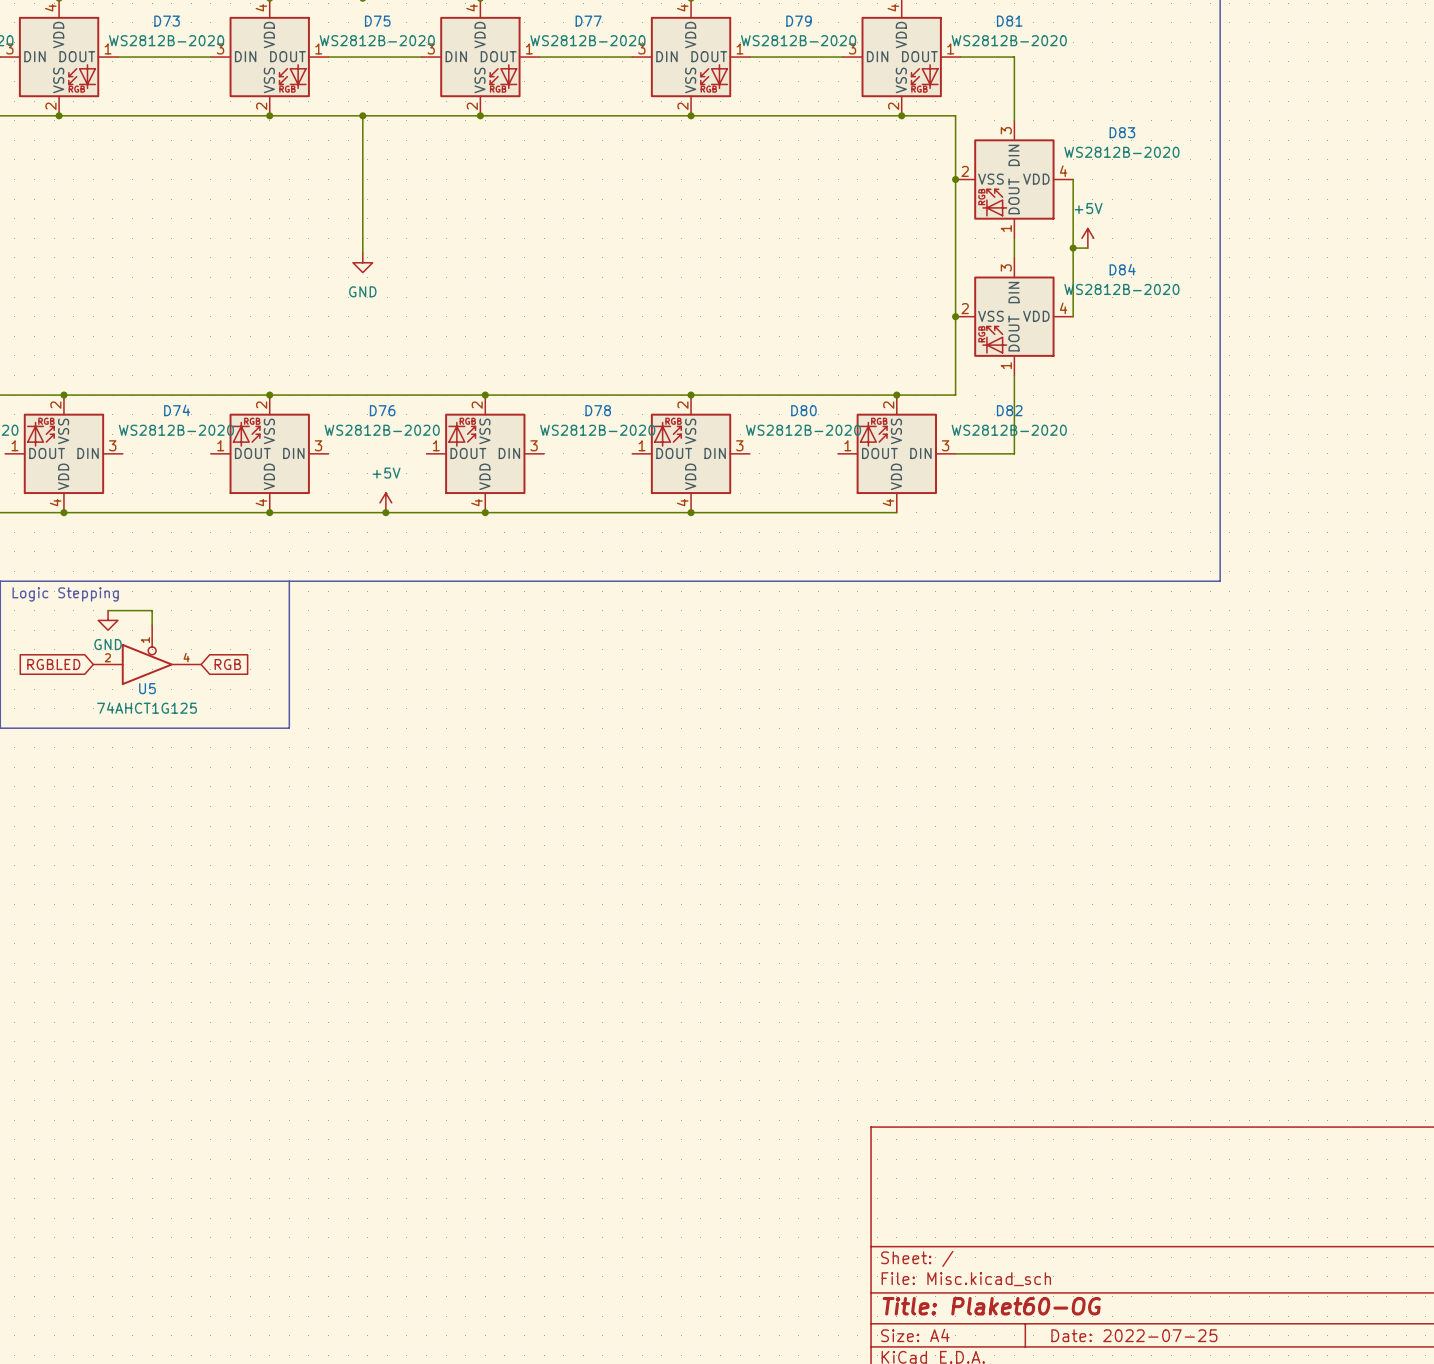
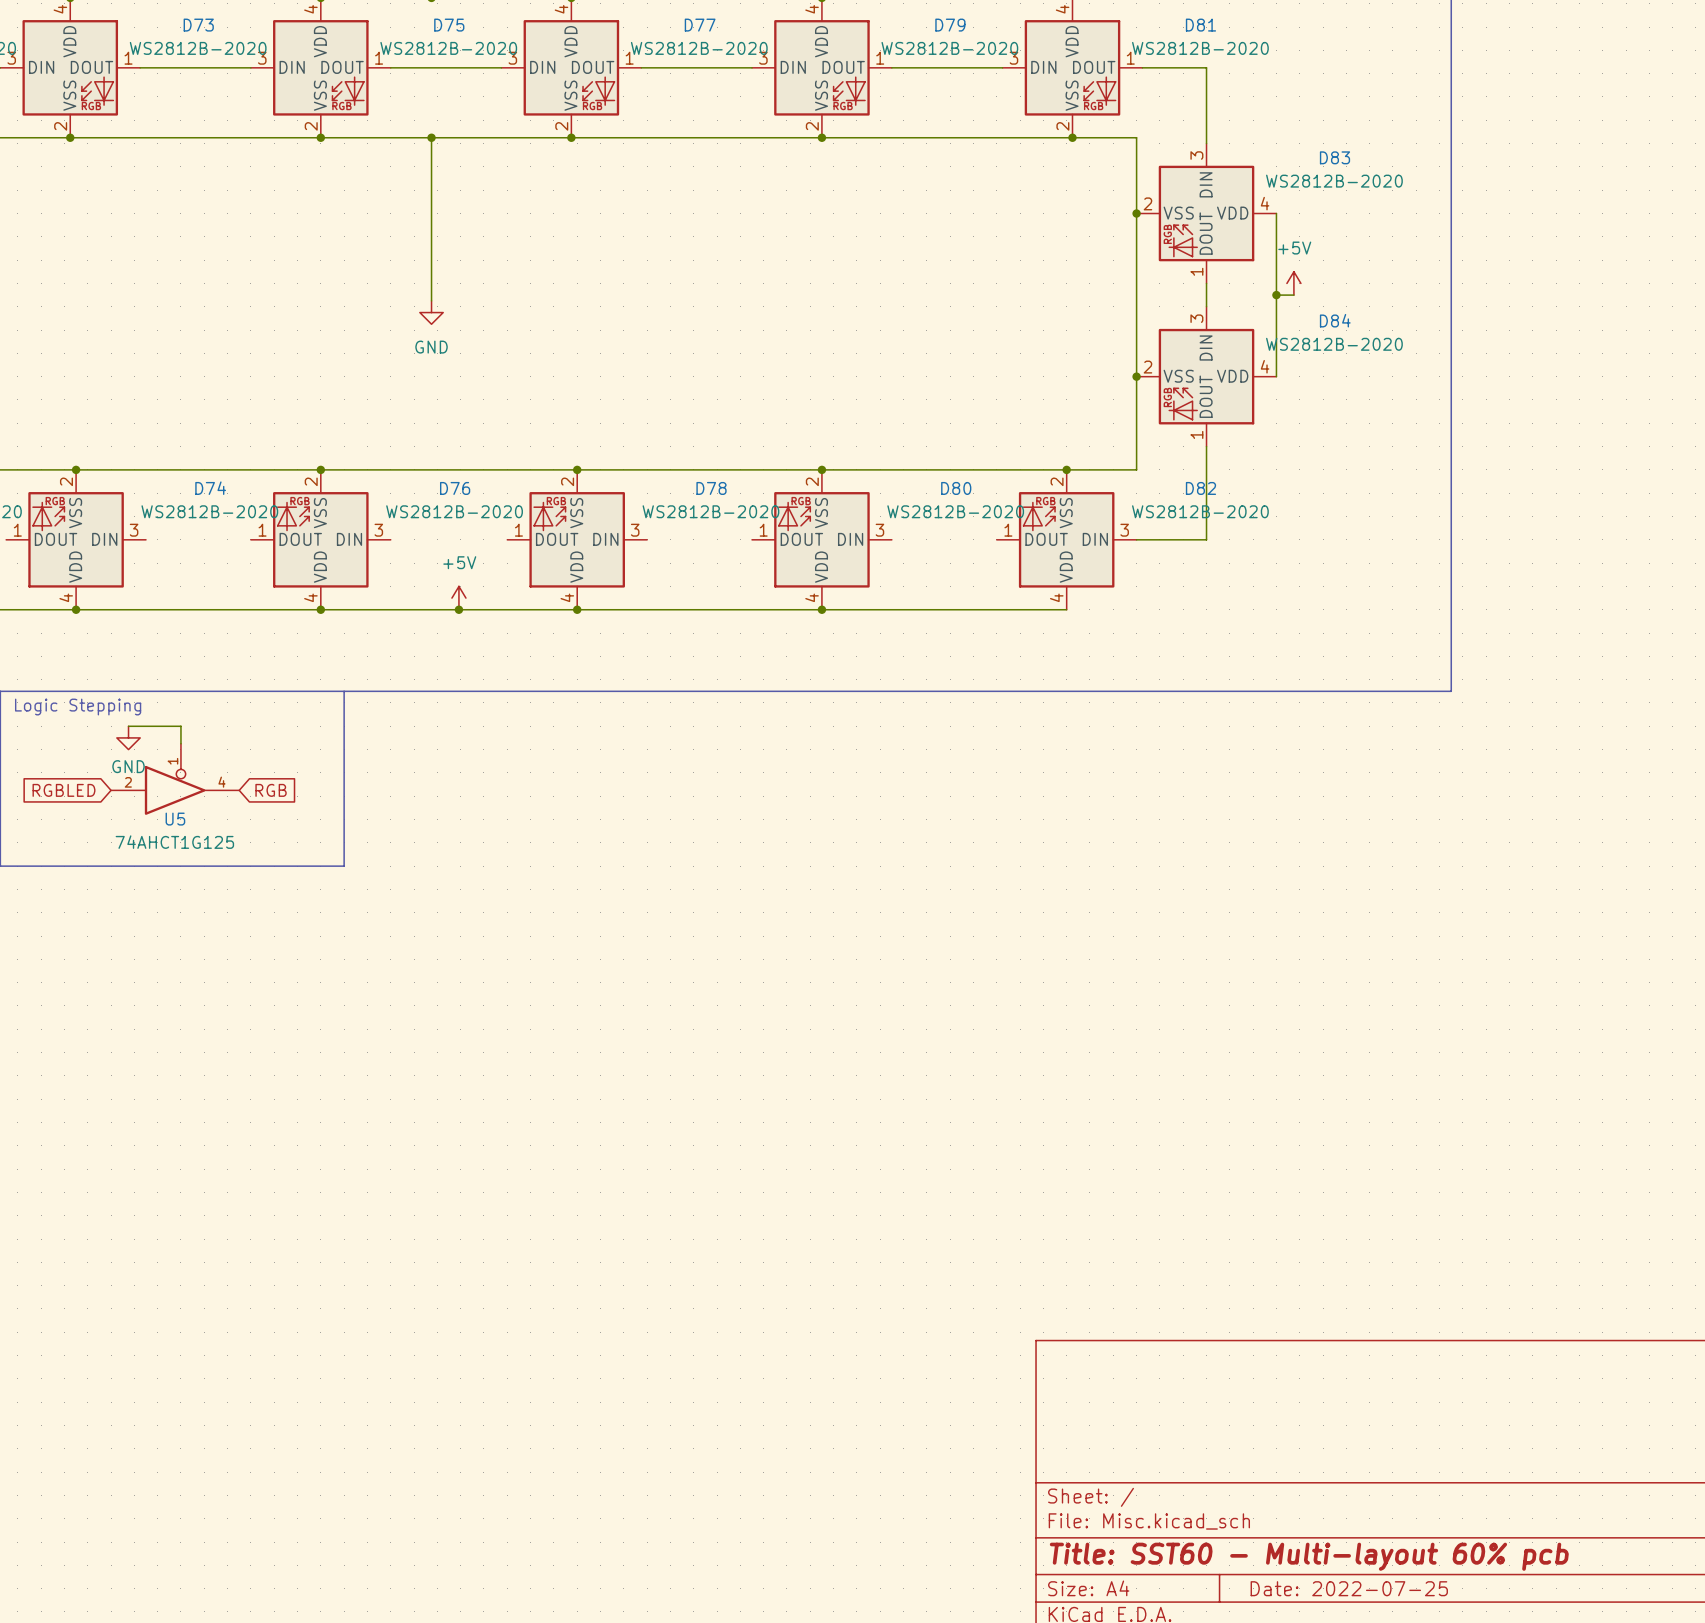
title block: Title: Plaket60-OG (991, 1306) -> Title: SST60 - Multi-layout 60% pcb (1309, 1556)

